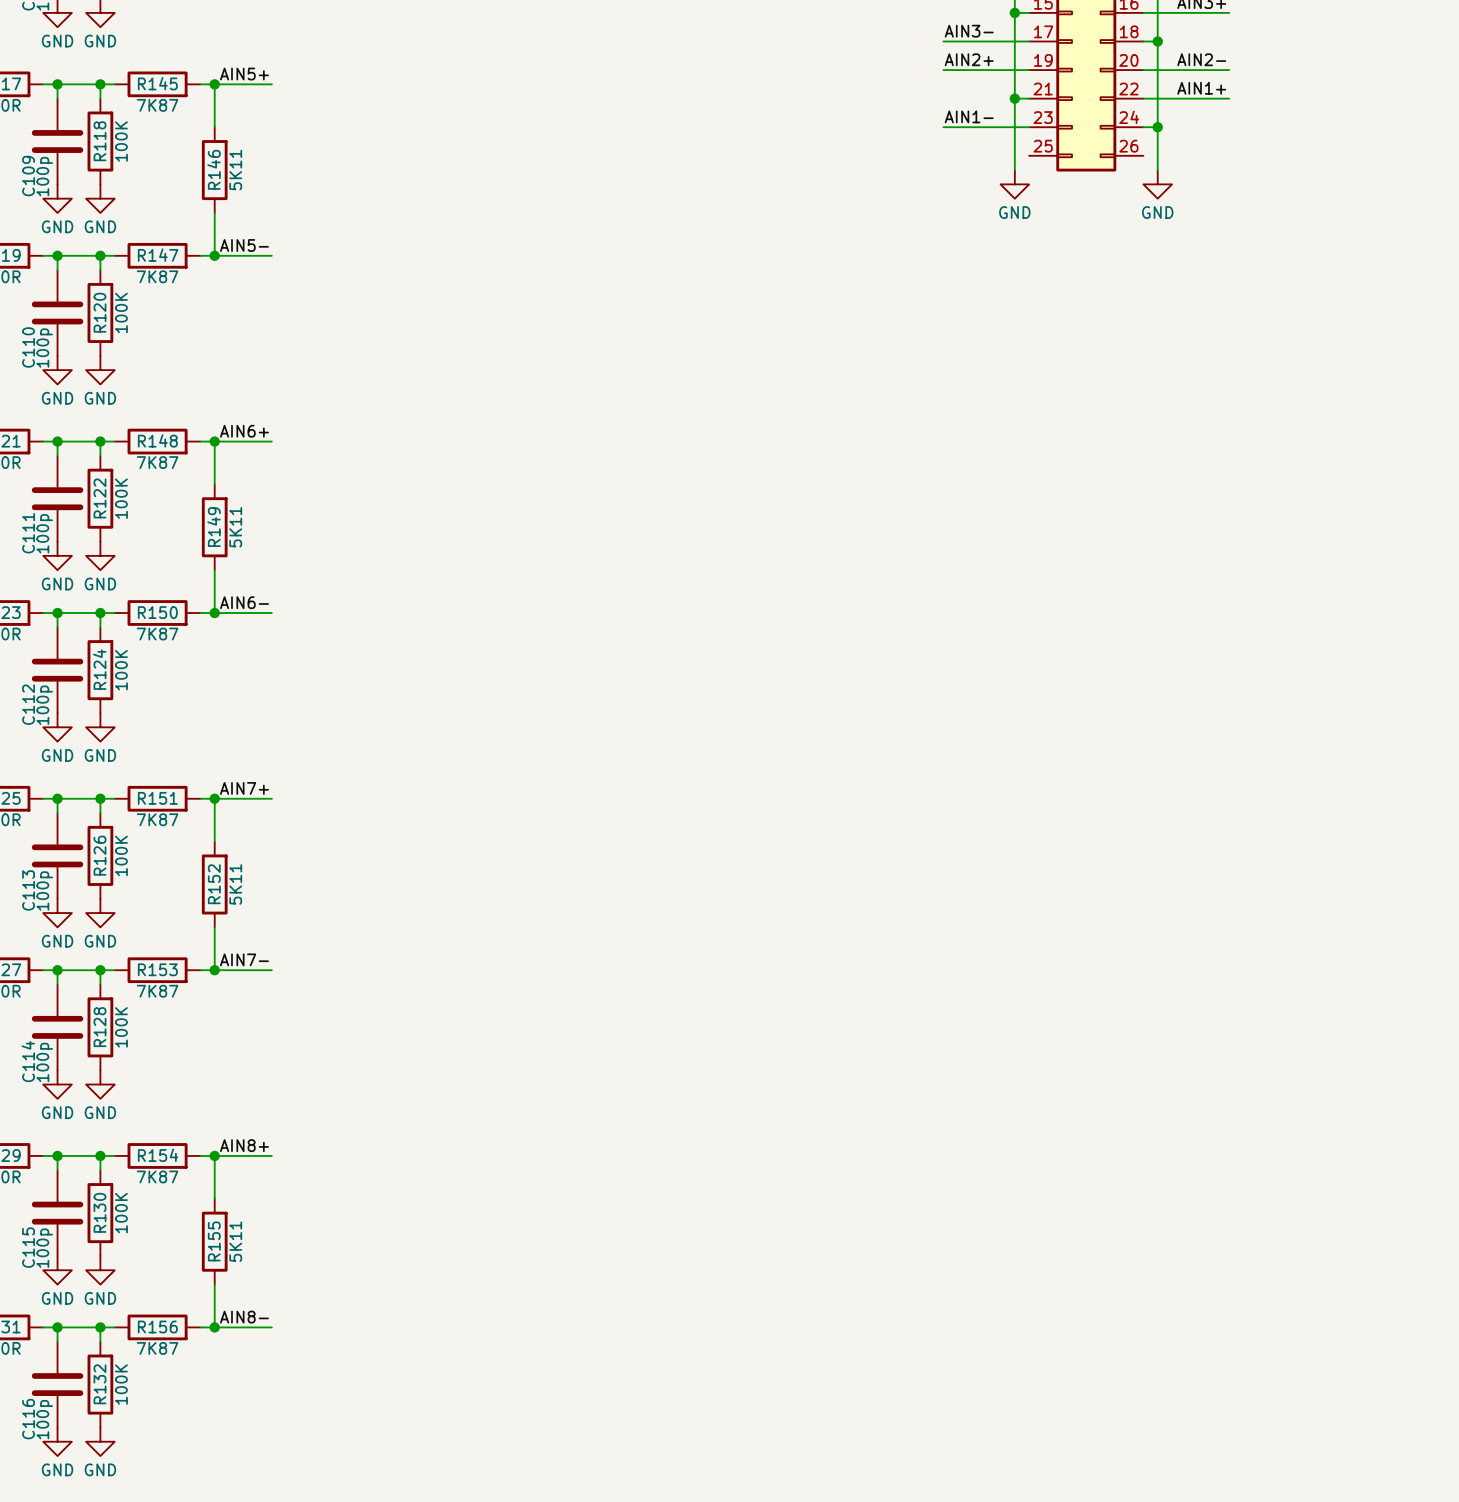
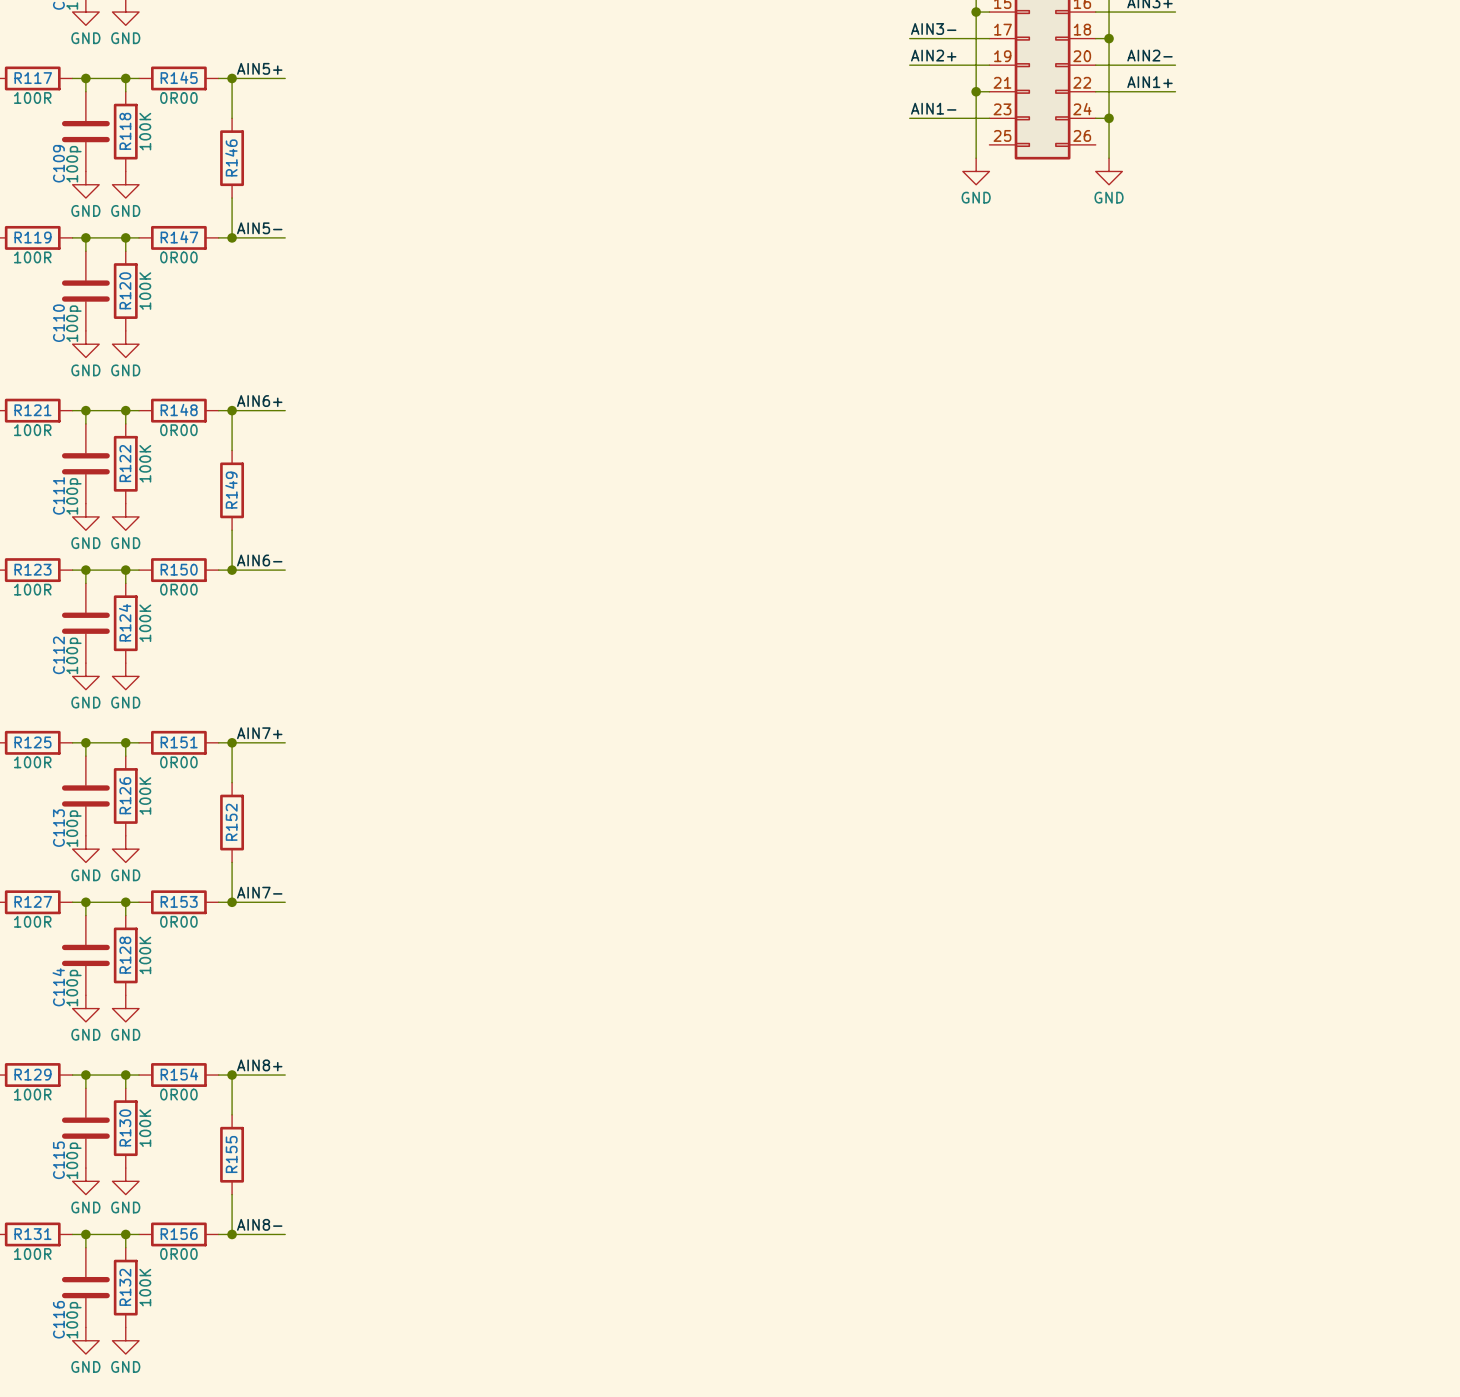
R145 text: 7K87 (157, 105) -> 0R00 (178, 98)
R146 text: 5K11 (235, 170) -> none
R147 text: 7K87 (157, 276) -> 0R00 (178, 257)
R148 text: 7K87 (157, 462) -> 0R00 (178, 430)
R149 text: 5K11 (235, 527) -> none
R150 text: 7K87 (157, 634) -> 0R00 (178, 589)
R151 text: 7K87 (157, 819) -> 0R00 (178, 762)
R152 text: 5K11 (235, 884) -> none
R153 text: 7K87 (157, 991) -> 0R00 (178, 921)
R154 text: 7K87 (157, 1176) -> 0R00 (178, 1094)
R155 text: 5K11 (235, 1241) -> none
R156 text: 7K87 (157, 1348) -> 0R00 (178, 1254)

